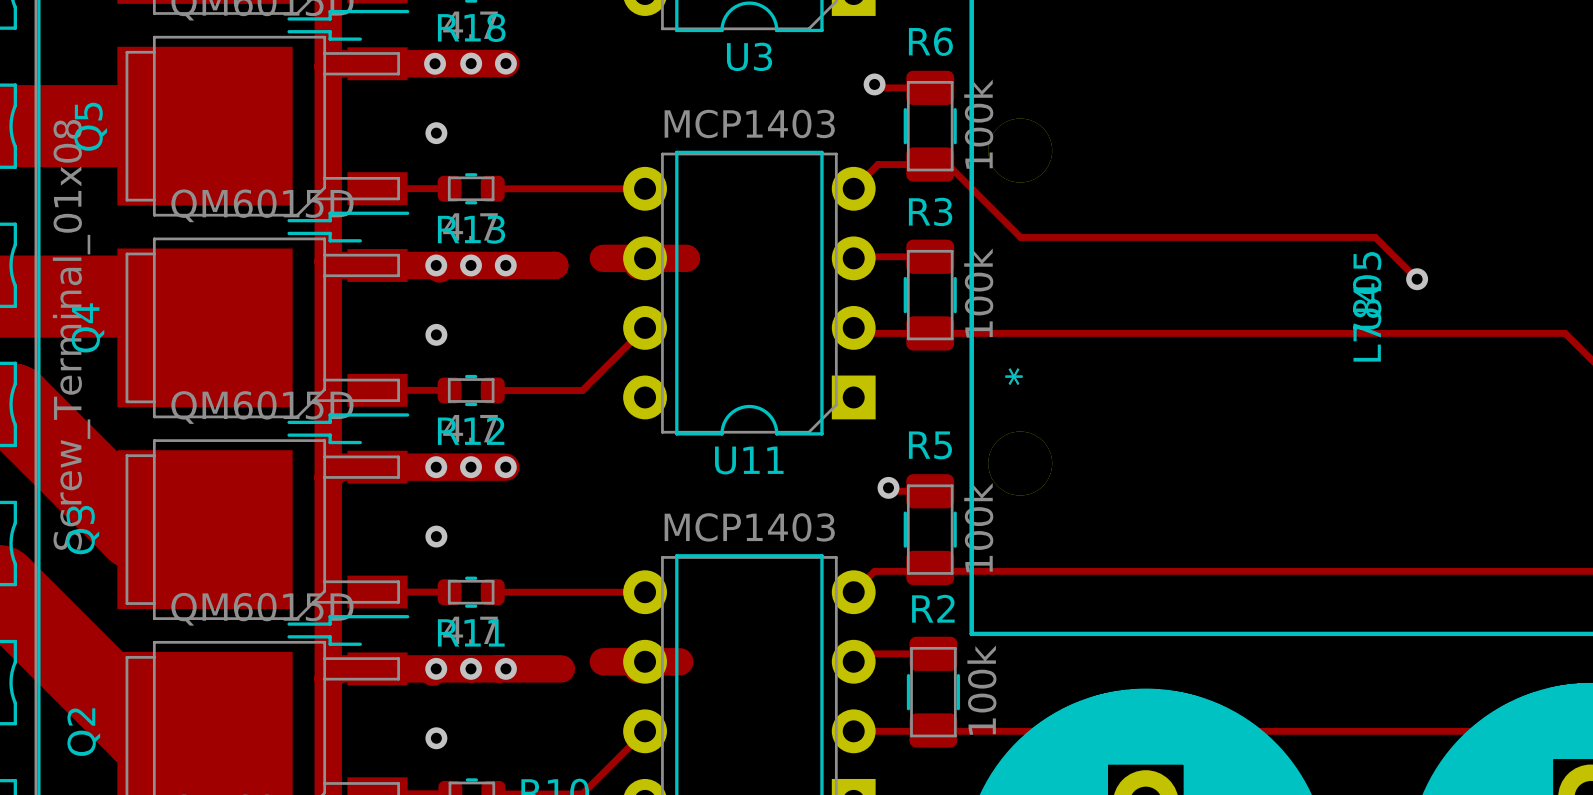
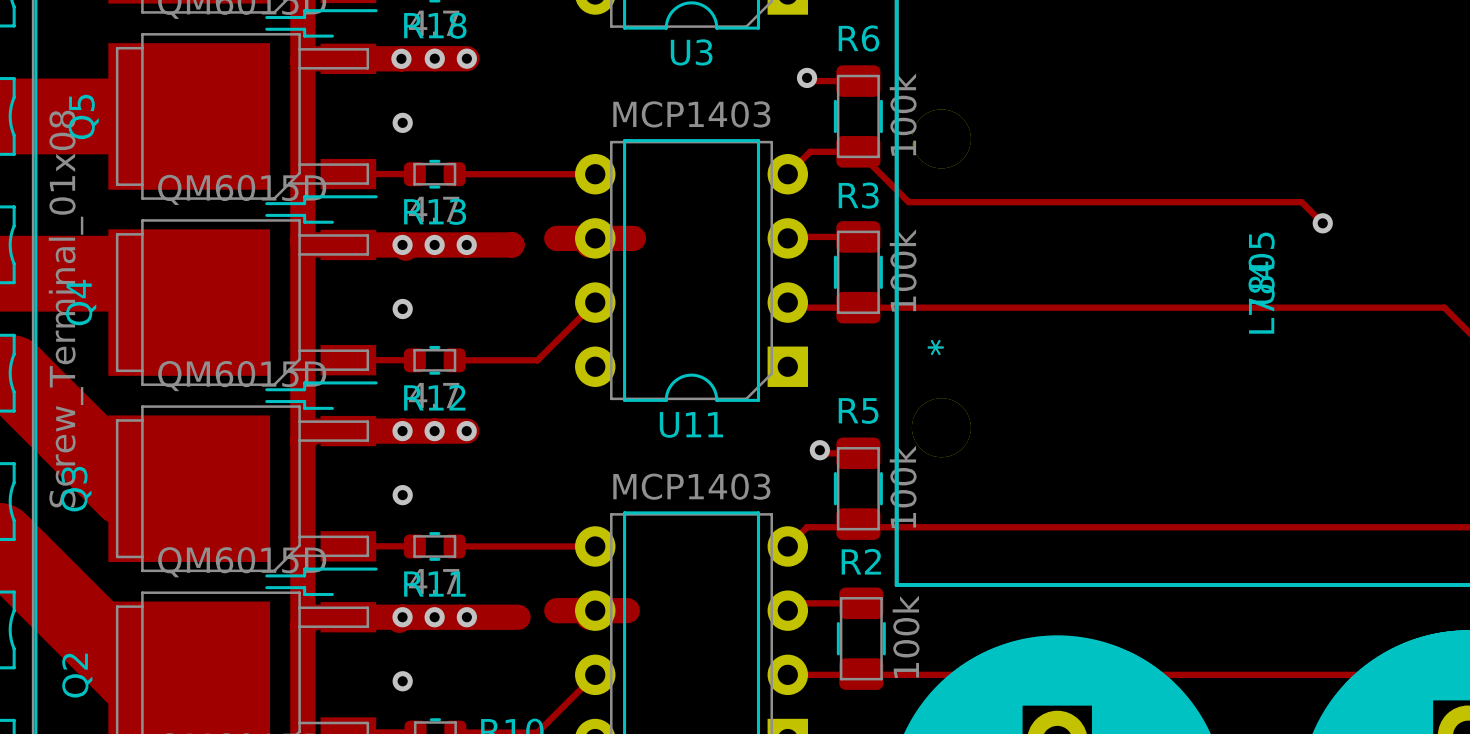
track: (930, 164) (947, 164) (1020, 237) (1375, 237) (1417, 279) -> (858, 151) (908, 202) (1301, 202) (1322, 223)
via position: (1417, 279) -> (1322, 223)

